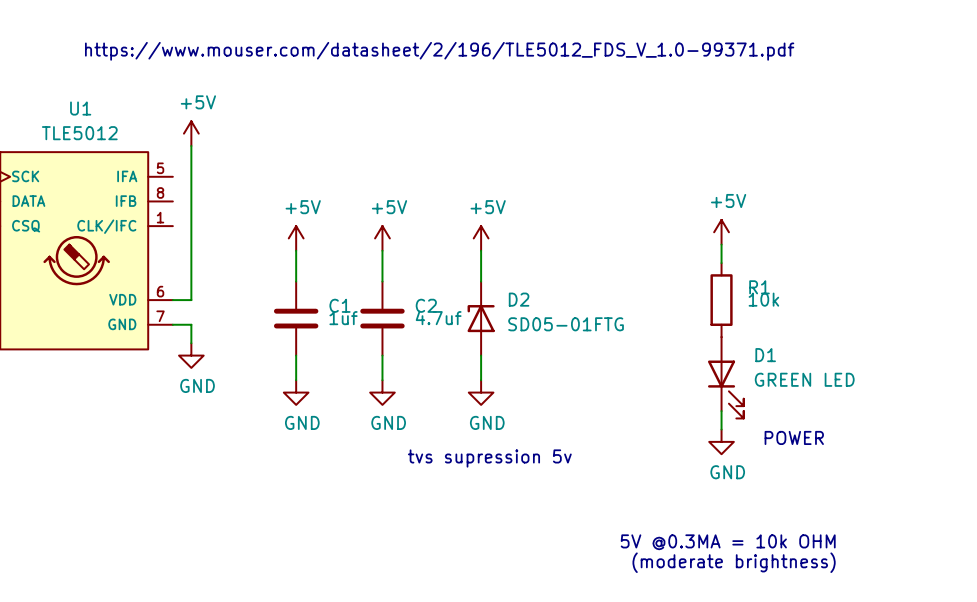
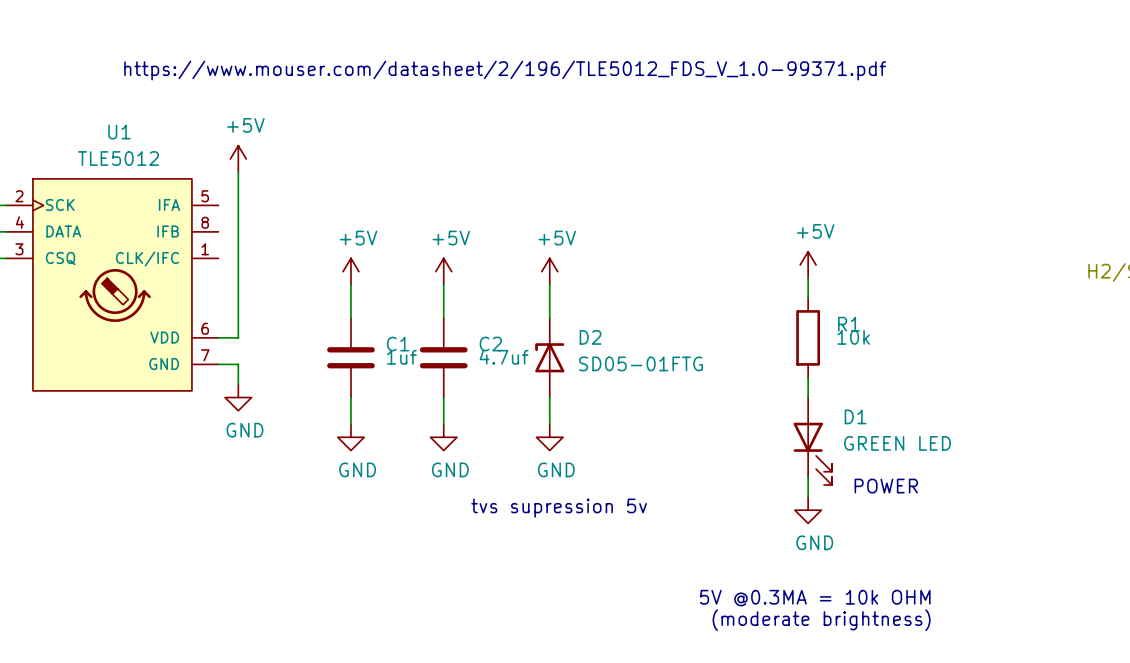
D1 position: (725, 377) -> (812, 441)
power symbol position: GND (721, 441) -> GND (808, 510)

